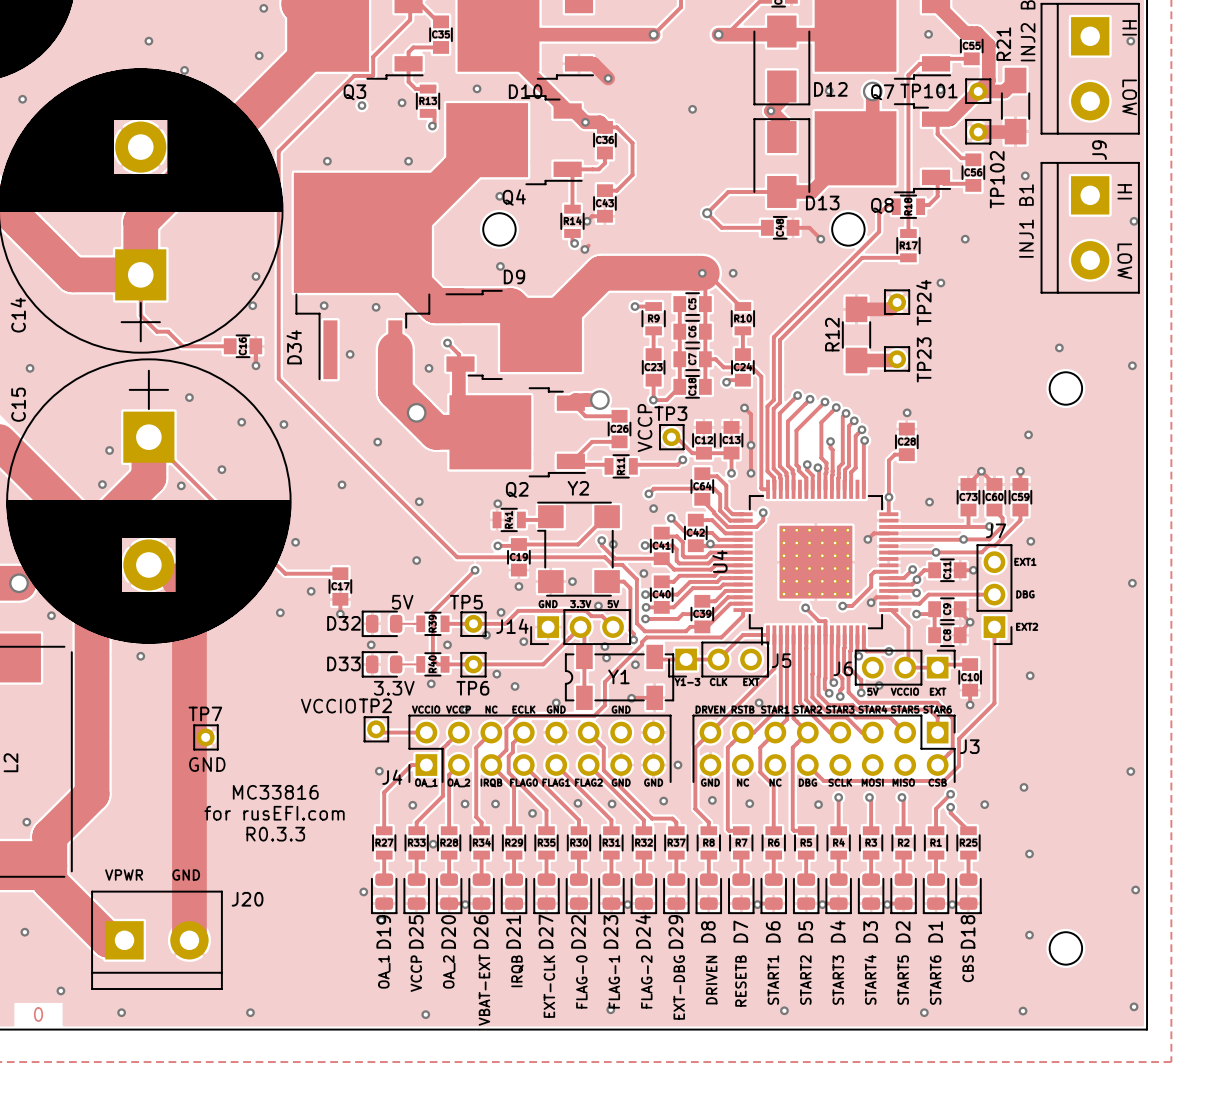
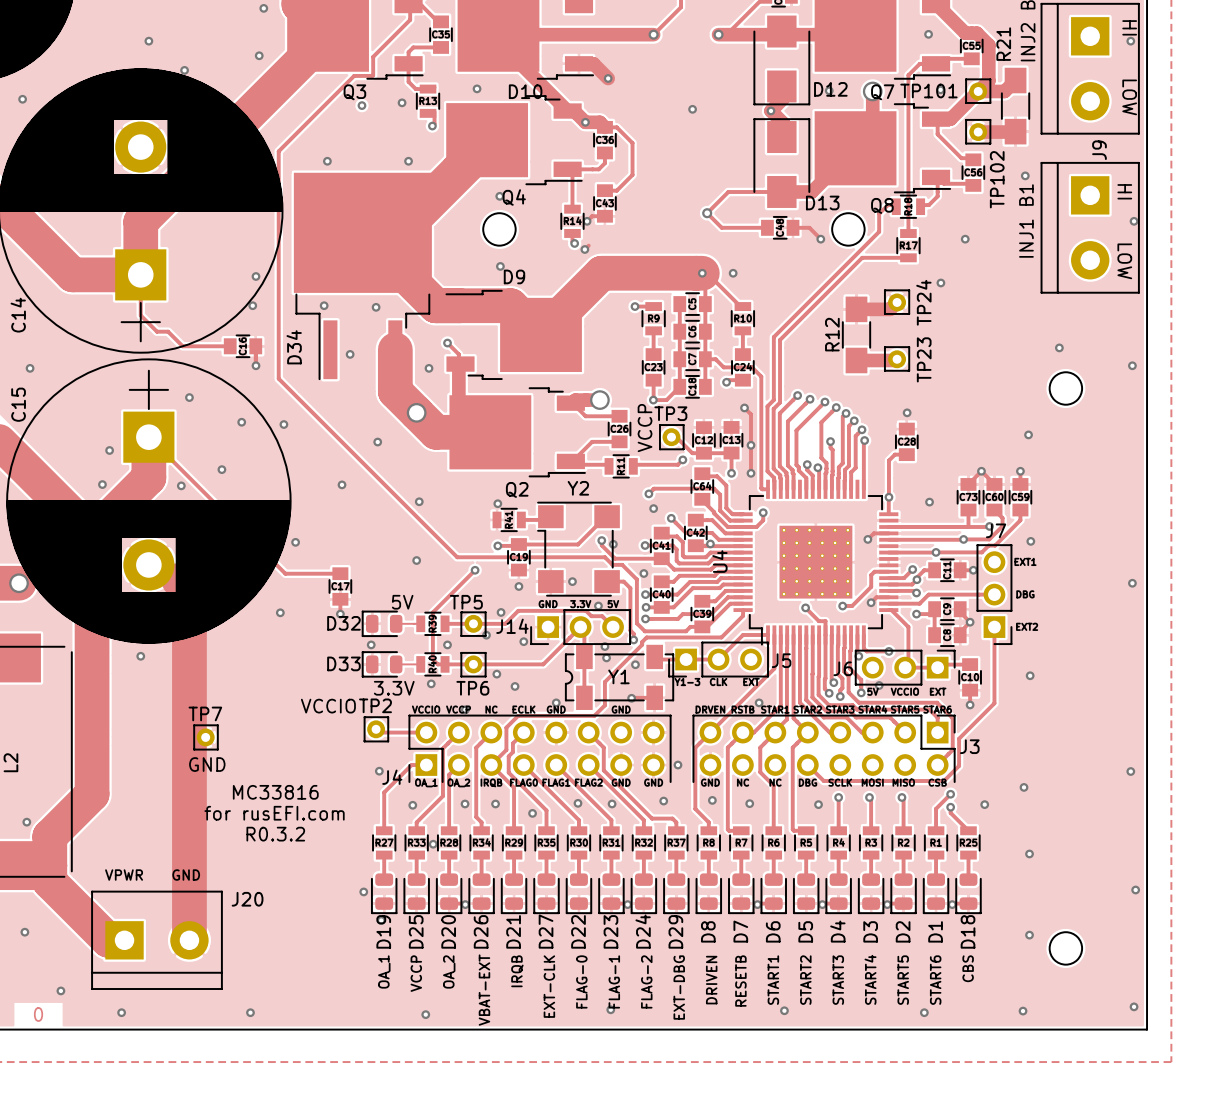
via: (311, 591) -> none
via: (51, 615) -> none
text: R0.3.3 (275, 834) -> R0.3.2 (275, 834)

